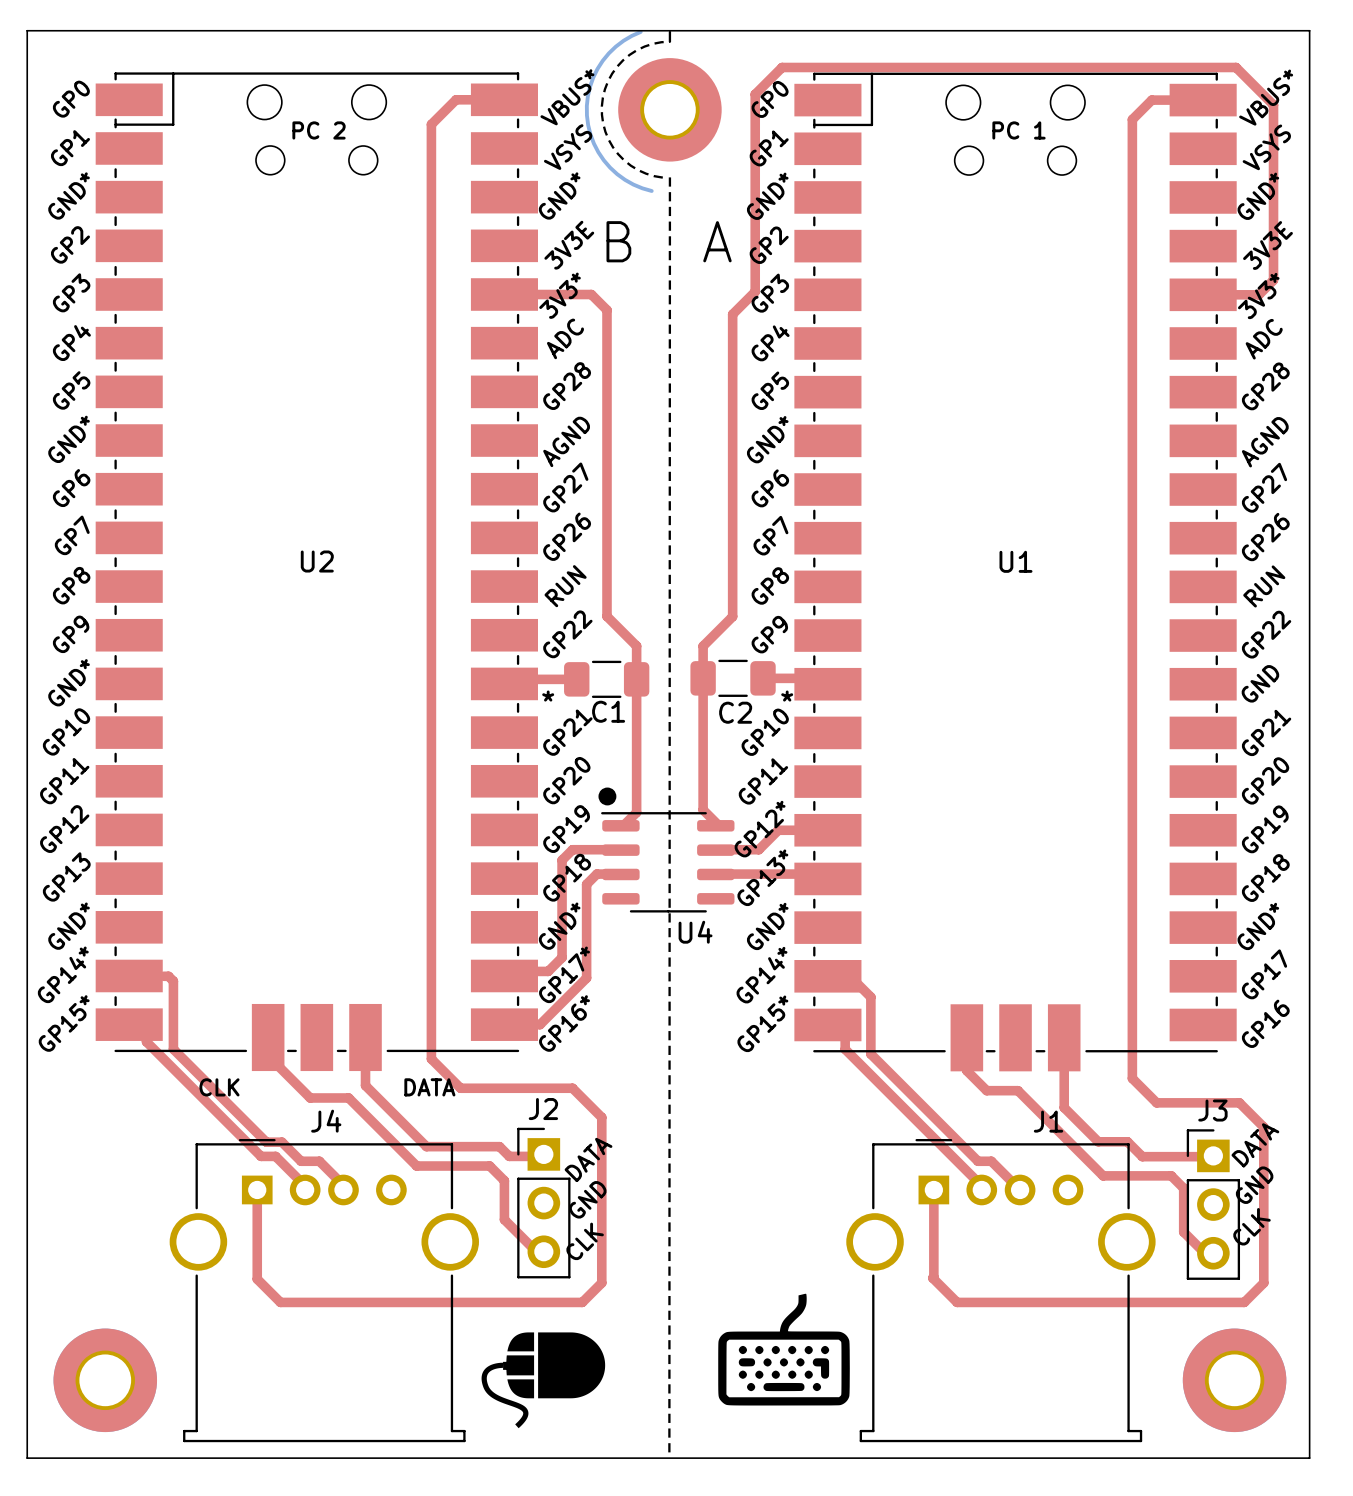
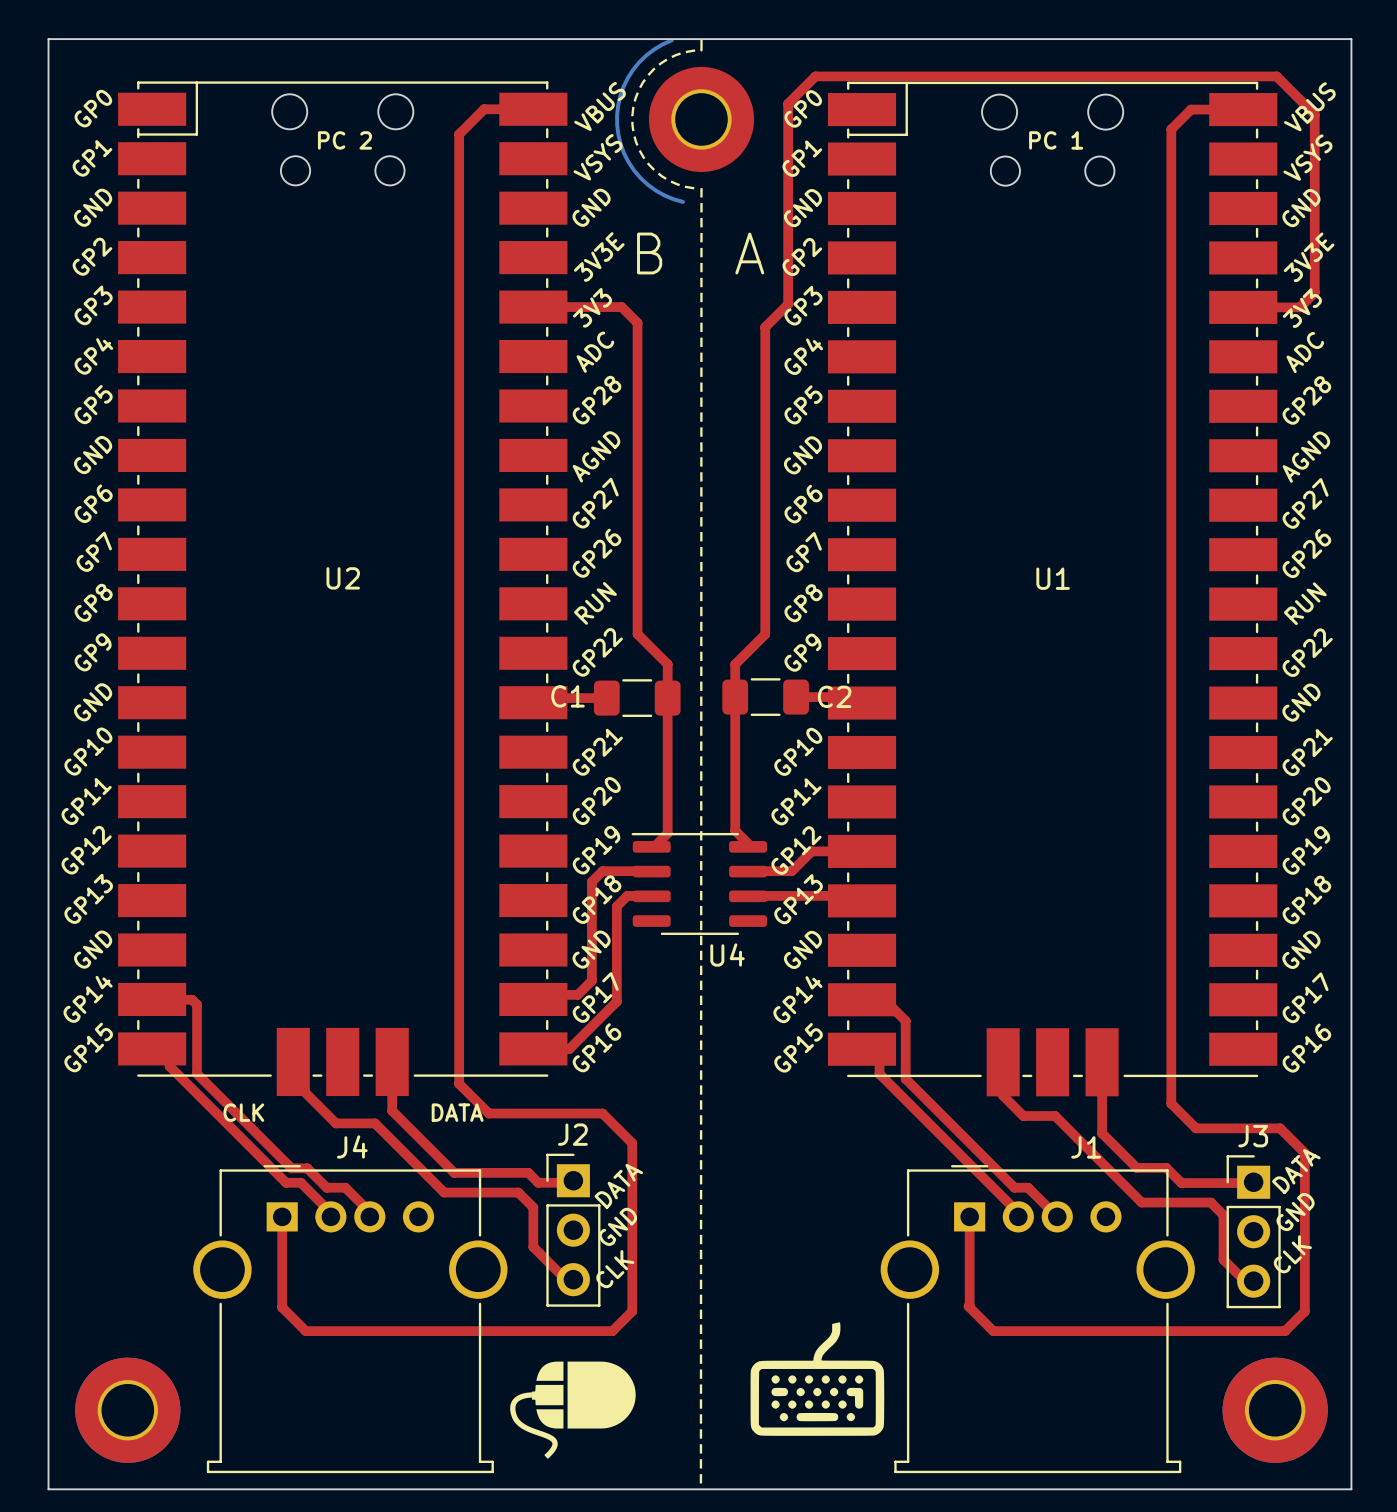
U2 footprint: [95, 72, 538, 1072] -> [118, 81, 568, 1097]
U1 footprint: [794, 72, 1237, 1072] -> [827, 81, 1278, 1097]
text: * (548, 696) -> none
text: * (787, 696) -> none
C1 name position: C1 (608, 711) -> C1 (568, 696)
C2 name position: C2 (735, 712) -> C2 (834, 696)
drawing: [598, 787, 617, 806] -> none

